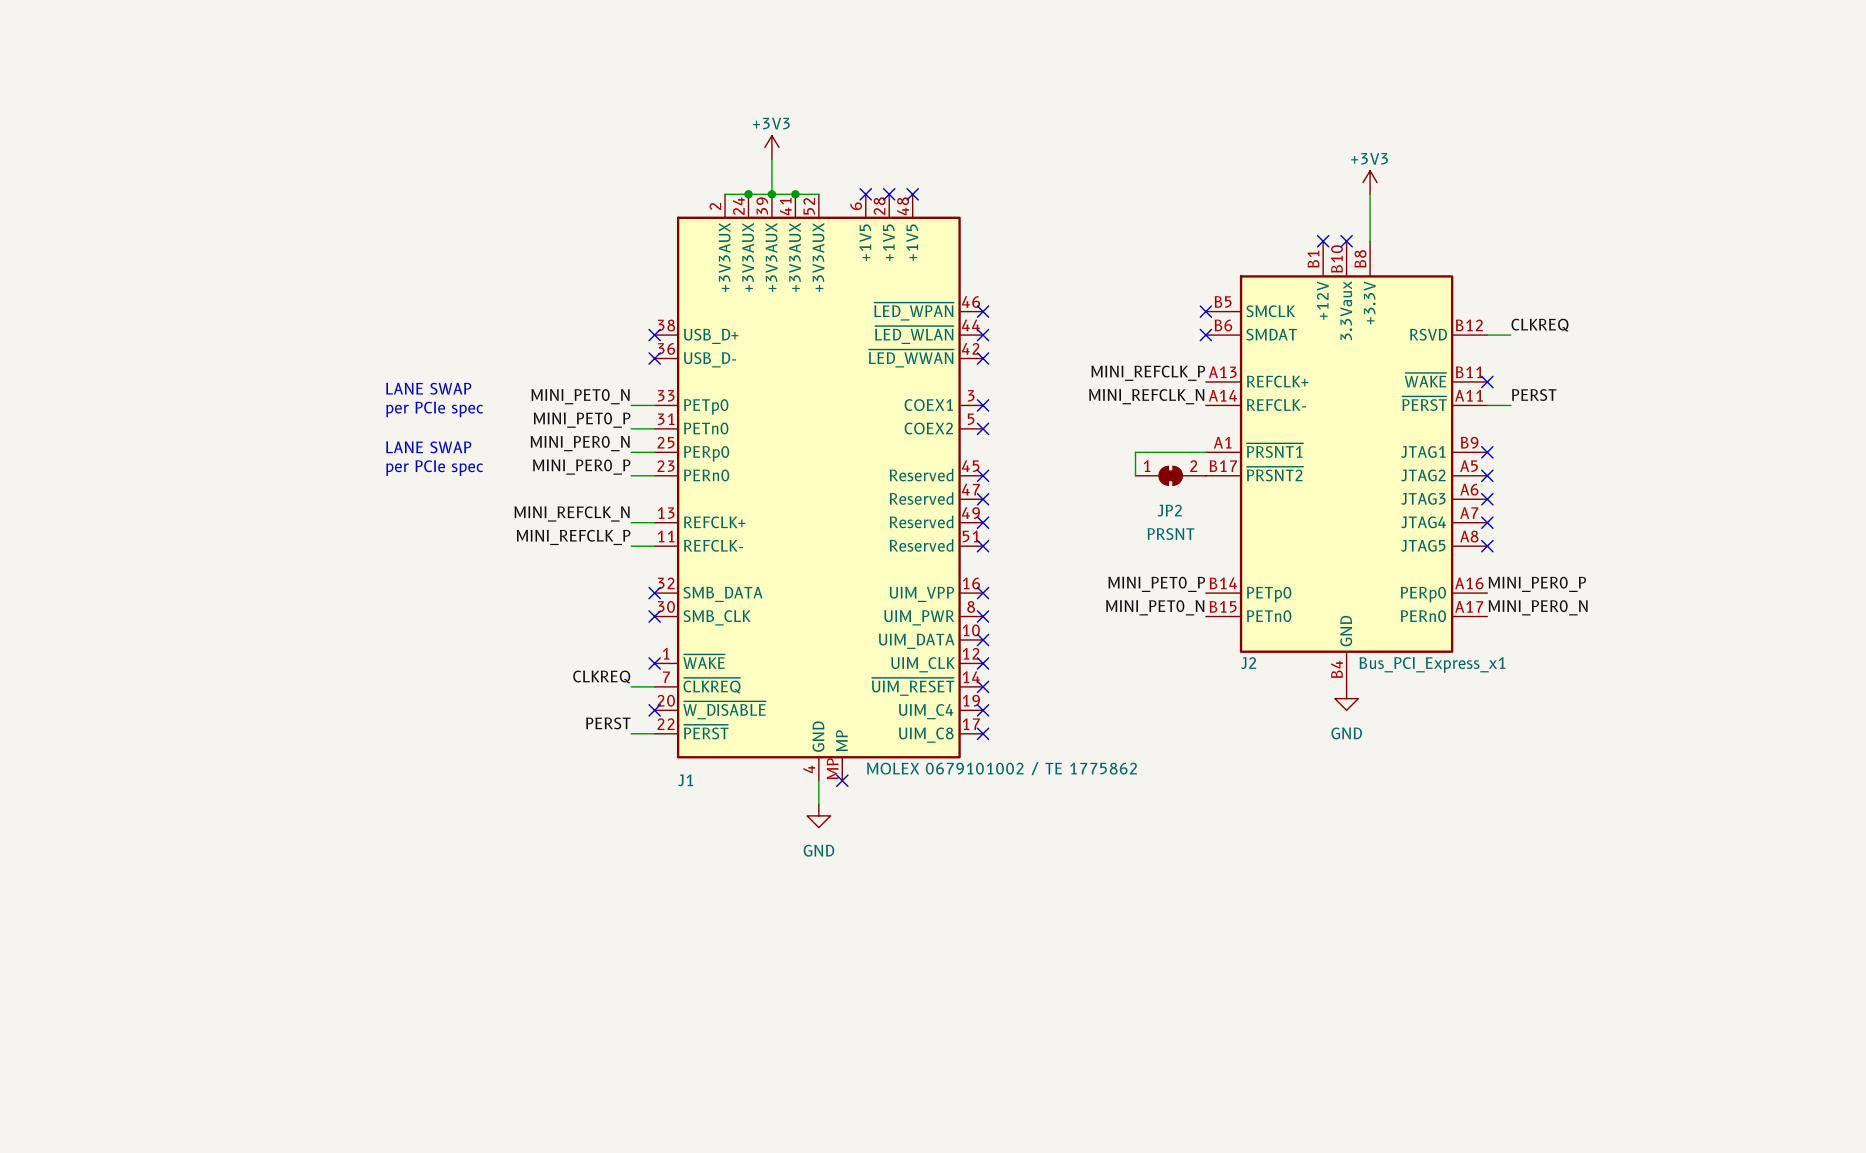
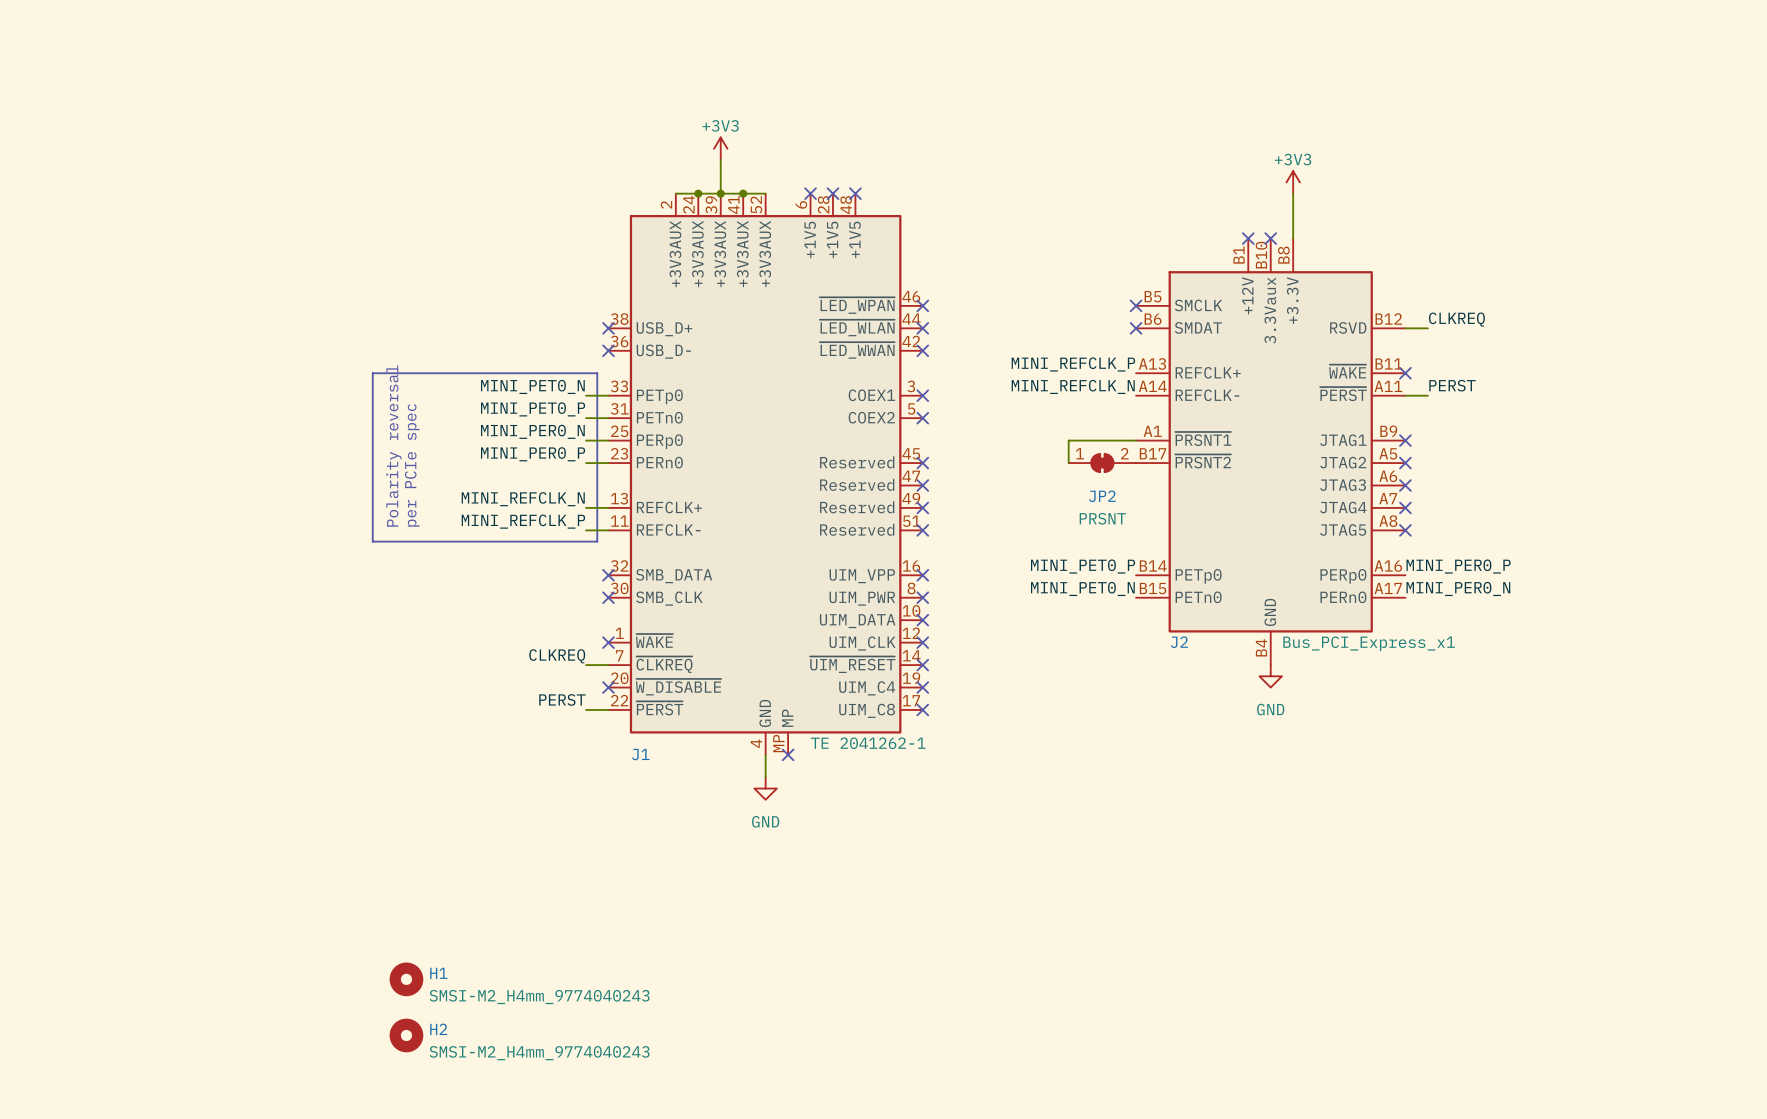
line: none -> (372, 373) (597, 373) (597, 541) (372, 541) (372, 373)
text: LANE SWAP (428, 388) -> none
text: per PCIe spec (434, 409) -> none
text: LANE SWAP (428, 447) -> none
text: per PCIe spec (434, 468) -> none
text: none -> Polarity reversal (393, 446)
text: none -> per PCIe spec (412, 465)
J1 value: MOLEX 0679101002 / TE 1775862 (1002, 768) -> TE 2041262-1 (868, 743)
H1: none -> SMSI-M2_H4mm_9774040243 (406, 979)
H2: none -> SMSI-M2_H4mm_9774040243 (406, 1035)

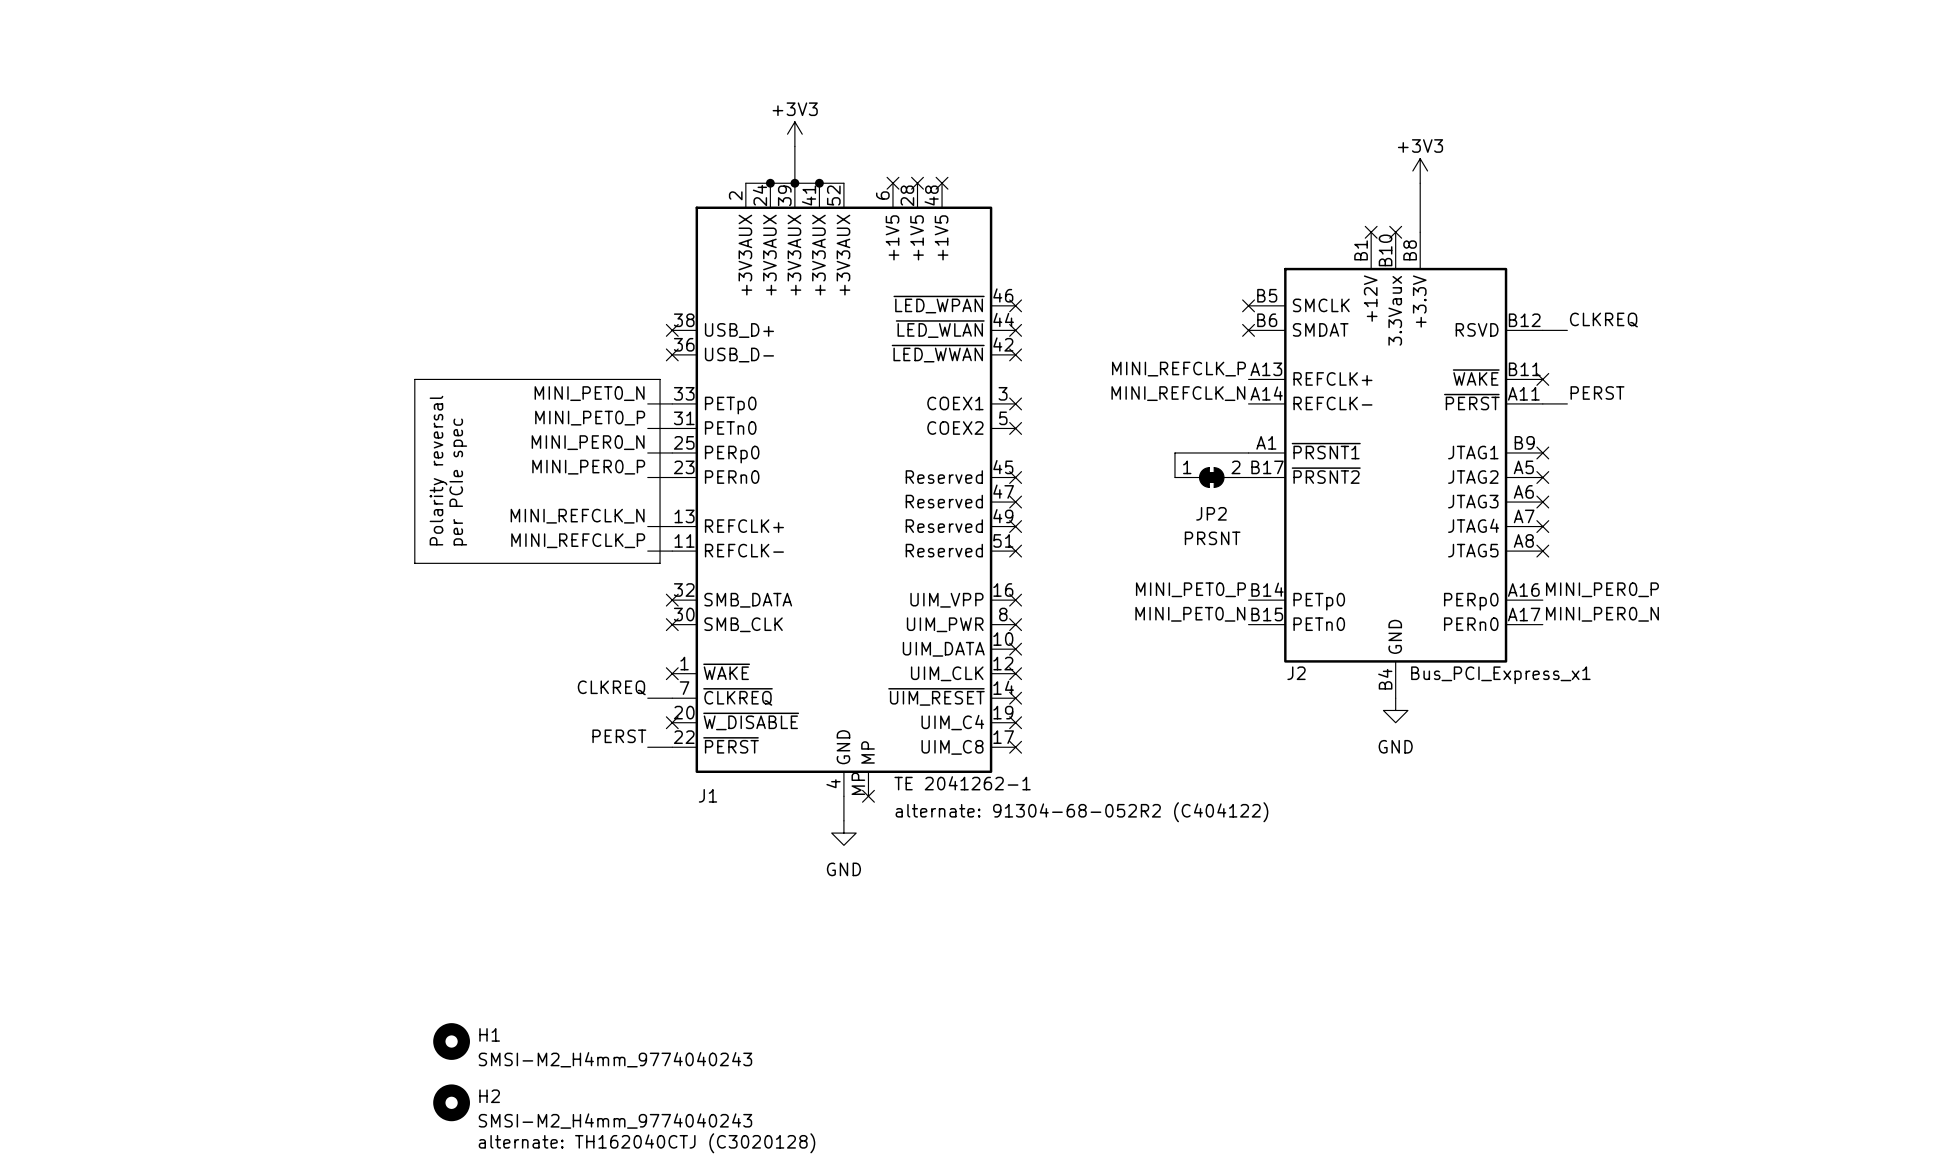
text: none -> alternate: 91304-68-052R2 (C404122) (1081, 812)
text: none -> alternate: TH162040CTJ (C3020128) (646, 1143)

